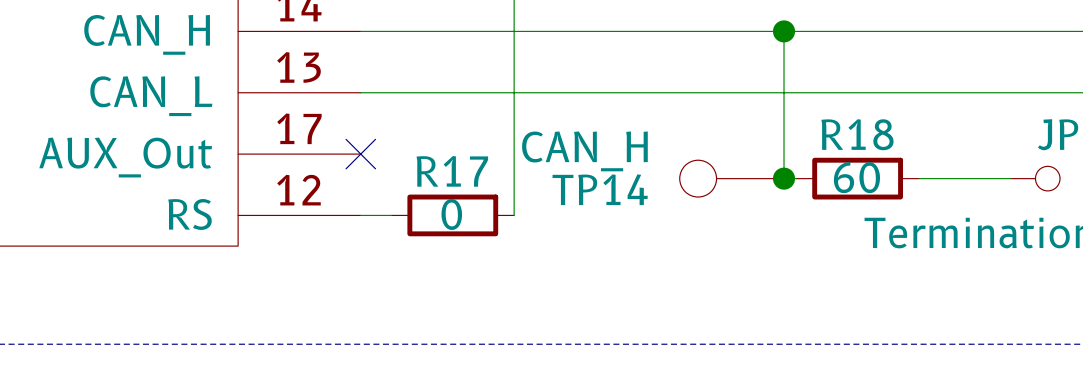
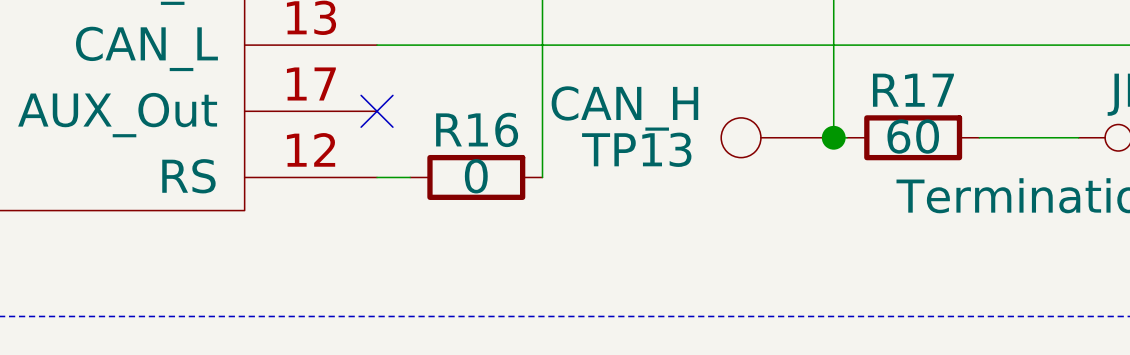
R18 name: R18 (857, 134) -> R17 (913, 90)
R17 name: R17 (452, 171) -> R16 (477, 129)
TP14 name: TP14 (600, 189) -> TP13 (636, 149)

